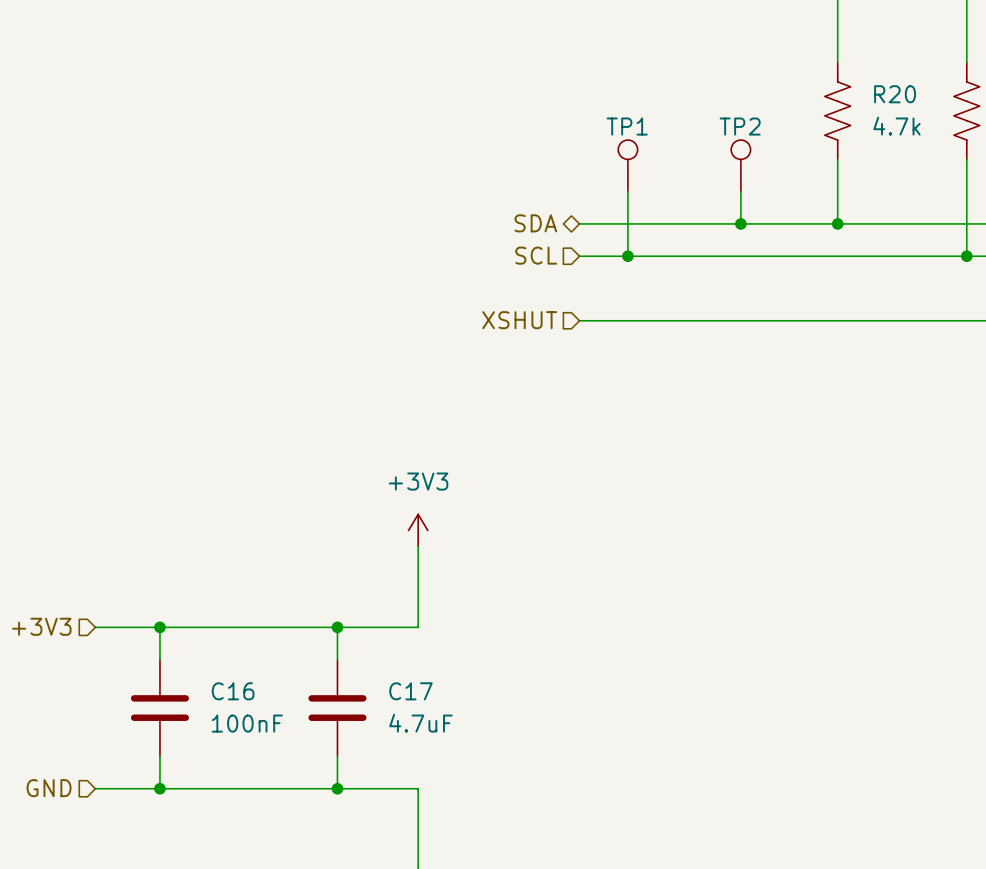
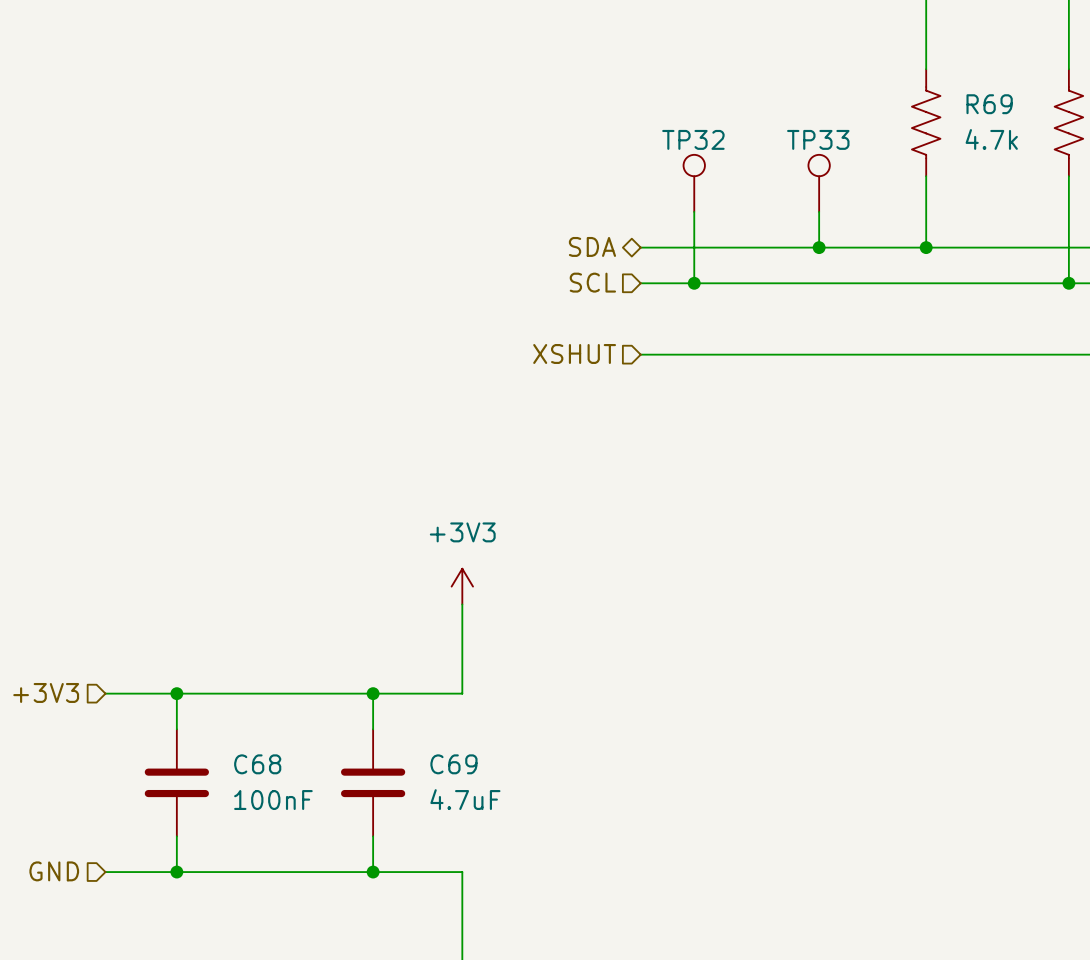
R20 name: R20 (895, 94) -> R69 (989, 104)
TP1 name: TP1 (627, 126) -> TP32 (693, 139)
TP2 name: TP2 (740, 126) -> TP33 (818, 139)
C16 name: C16 (233, 691) -> C68 (257, 764)
C17 name: C17 (410, 691) -> C69 (453, 764)

